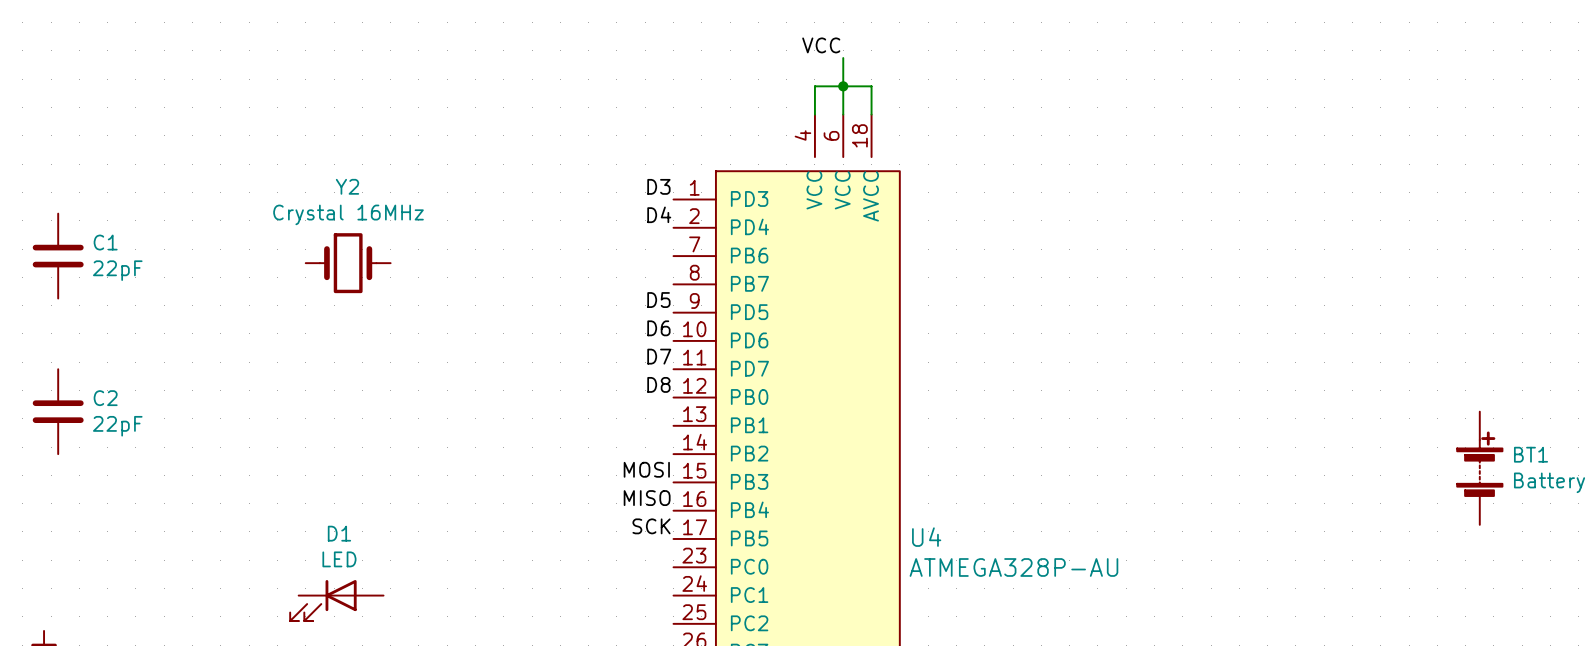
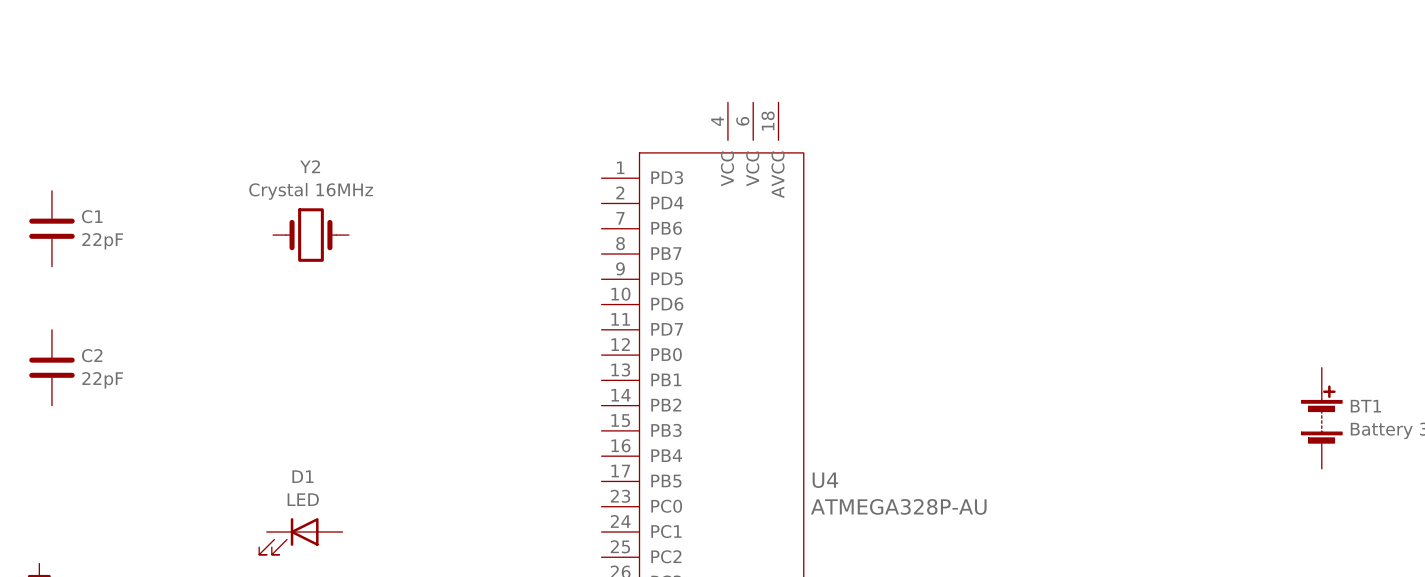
label: VCC (821, 45) -> none
wire: (843, 58) (843, 114) -> none
junction: (843, 86) -> none
wire: (814, 114) (814, 86) (871, 86) (871, 114) -> none
label: D3 (658, 186) -> none
label: D4 (659, 214) -> none
label: D5 (658, 300) -> none
label: D6 (658, 328) -> none
label: D7 (659, 356) -> none
label: D8 (658, 384) -> none
label: MOSI (646, 469) -> none
label: MISO (647, 498) -> none
label: SCK (651, 526) -> none

